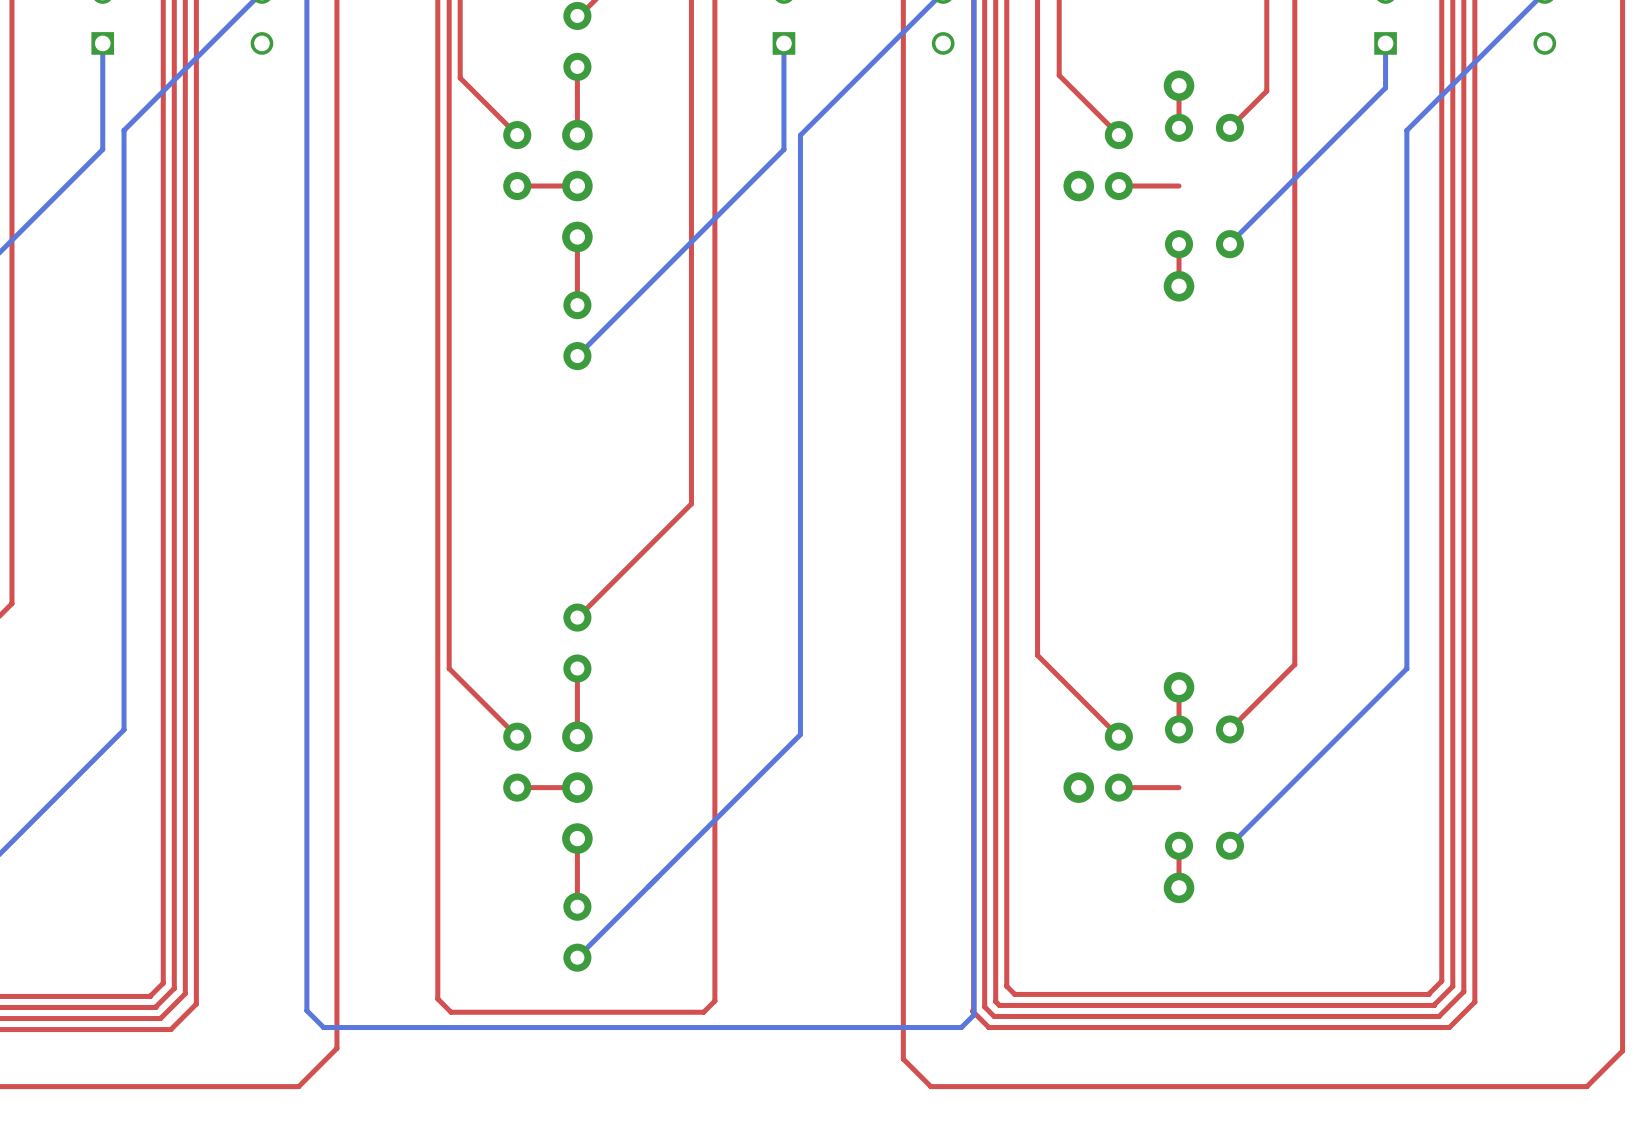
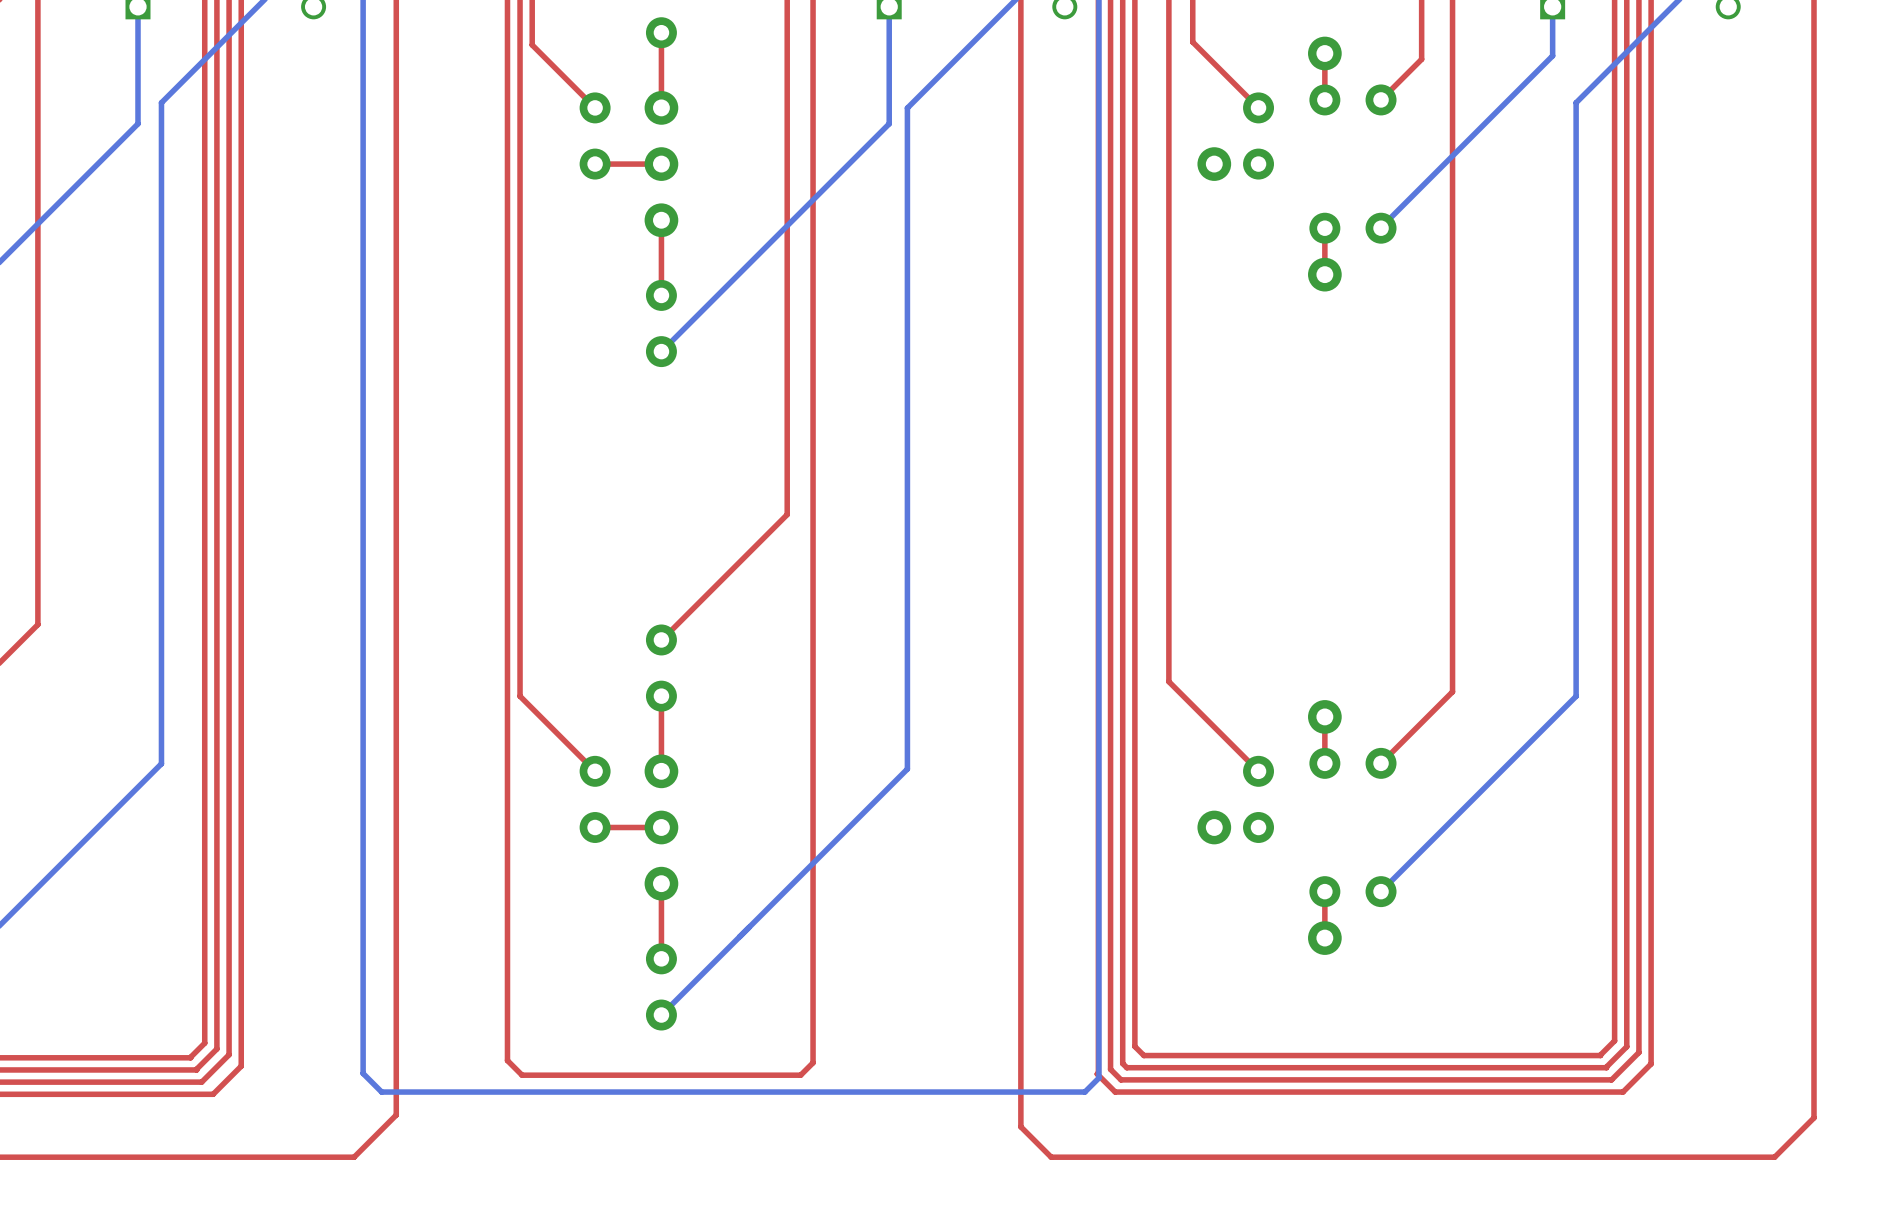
top track: (1179, 186) (1120, 186) -> none
top track: (1179, 787) (1120, 787) -> none

